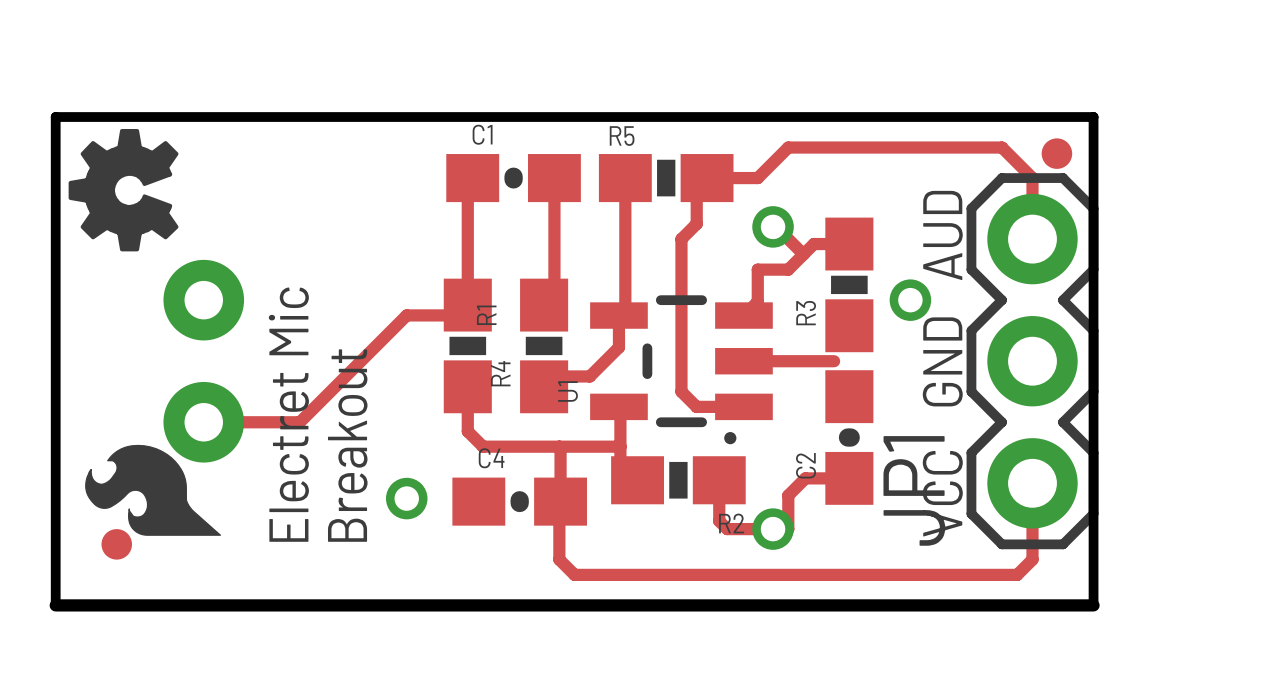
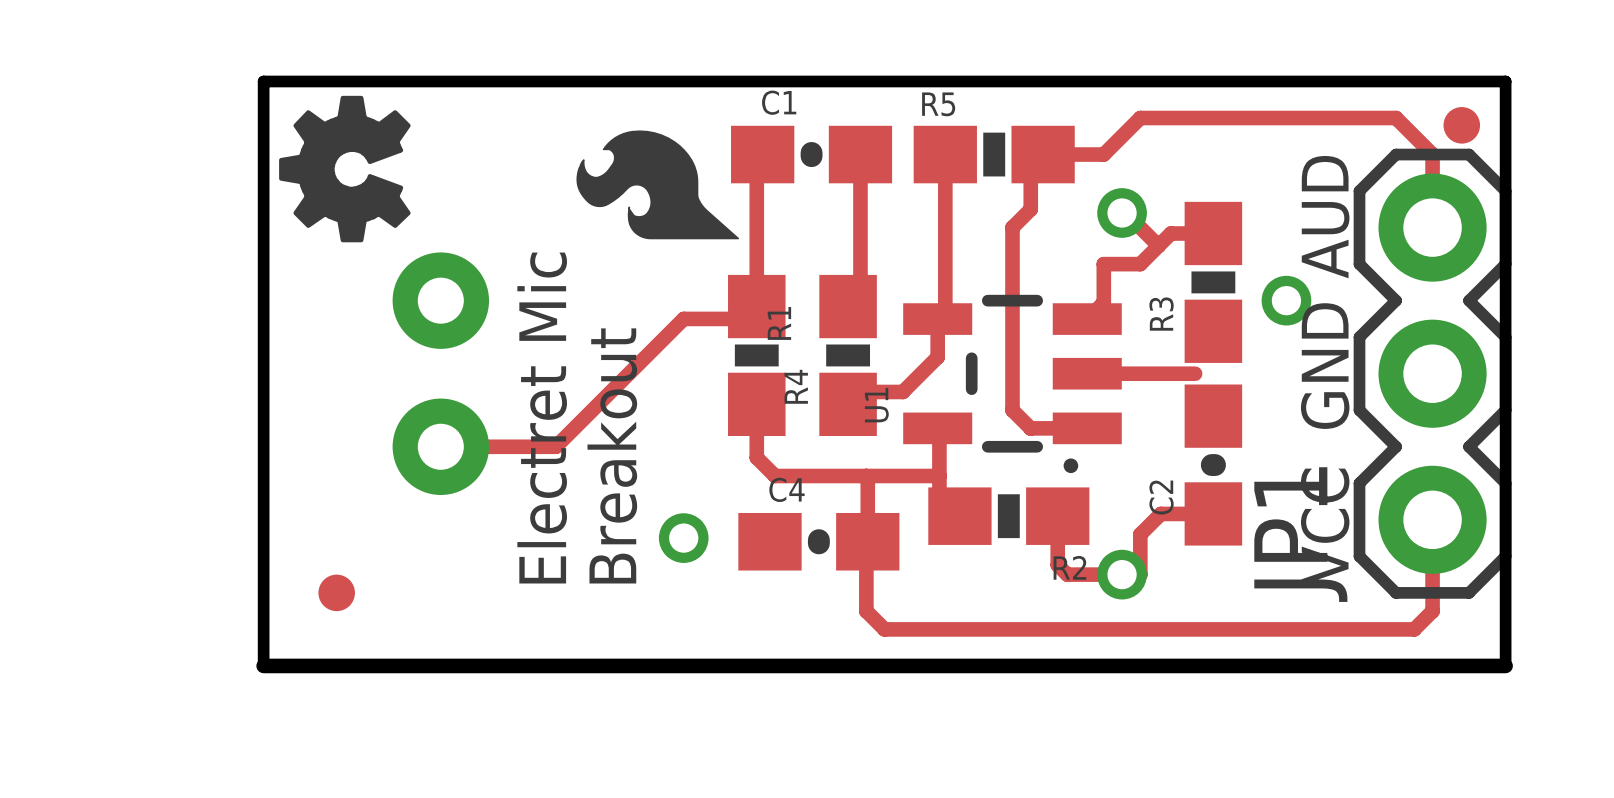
drawing position: (153, 490) -> (657, 184)

